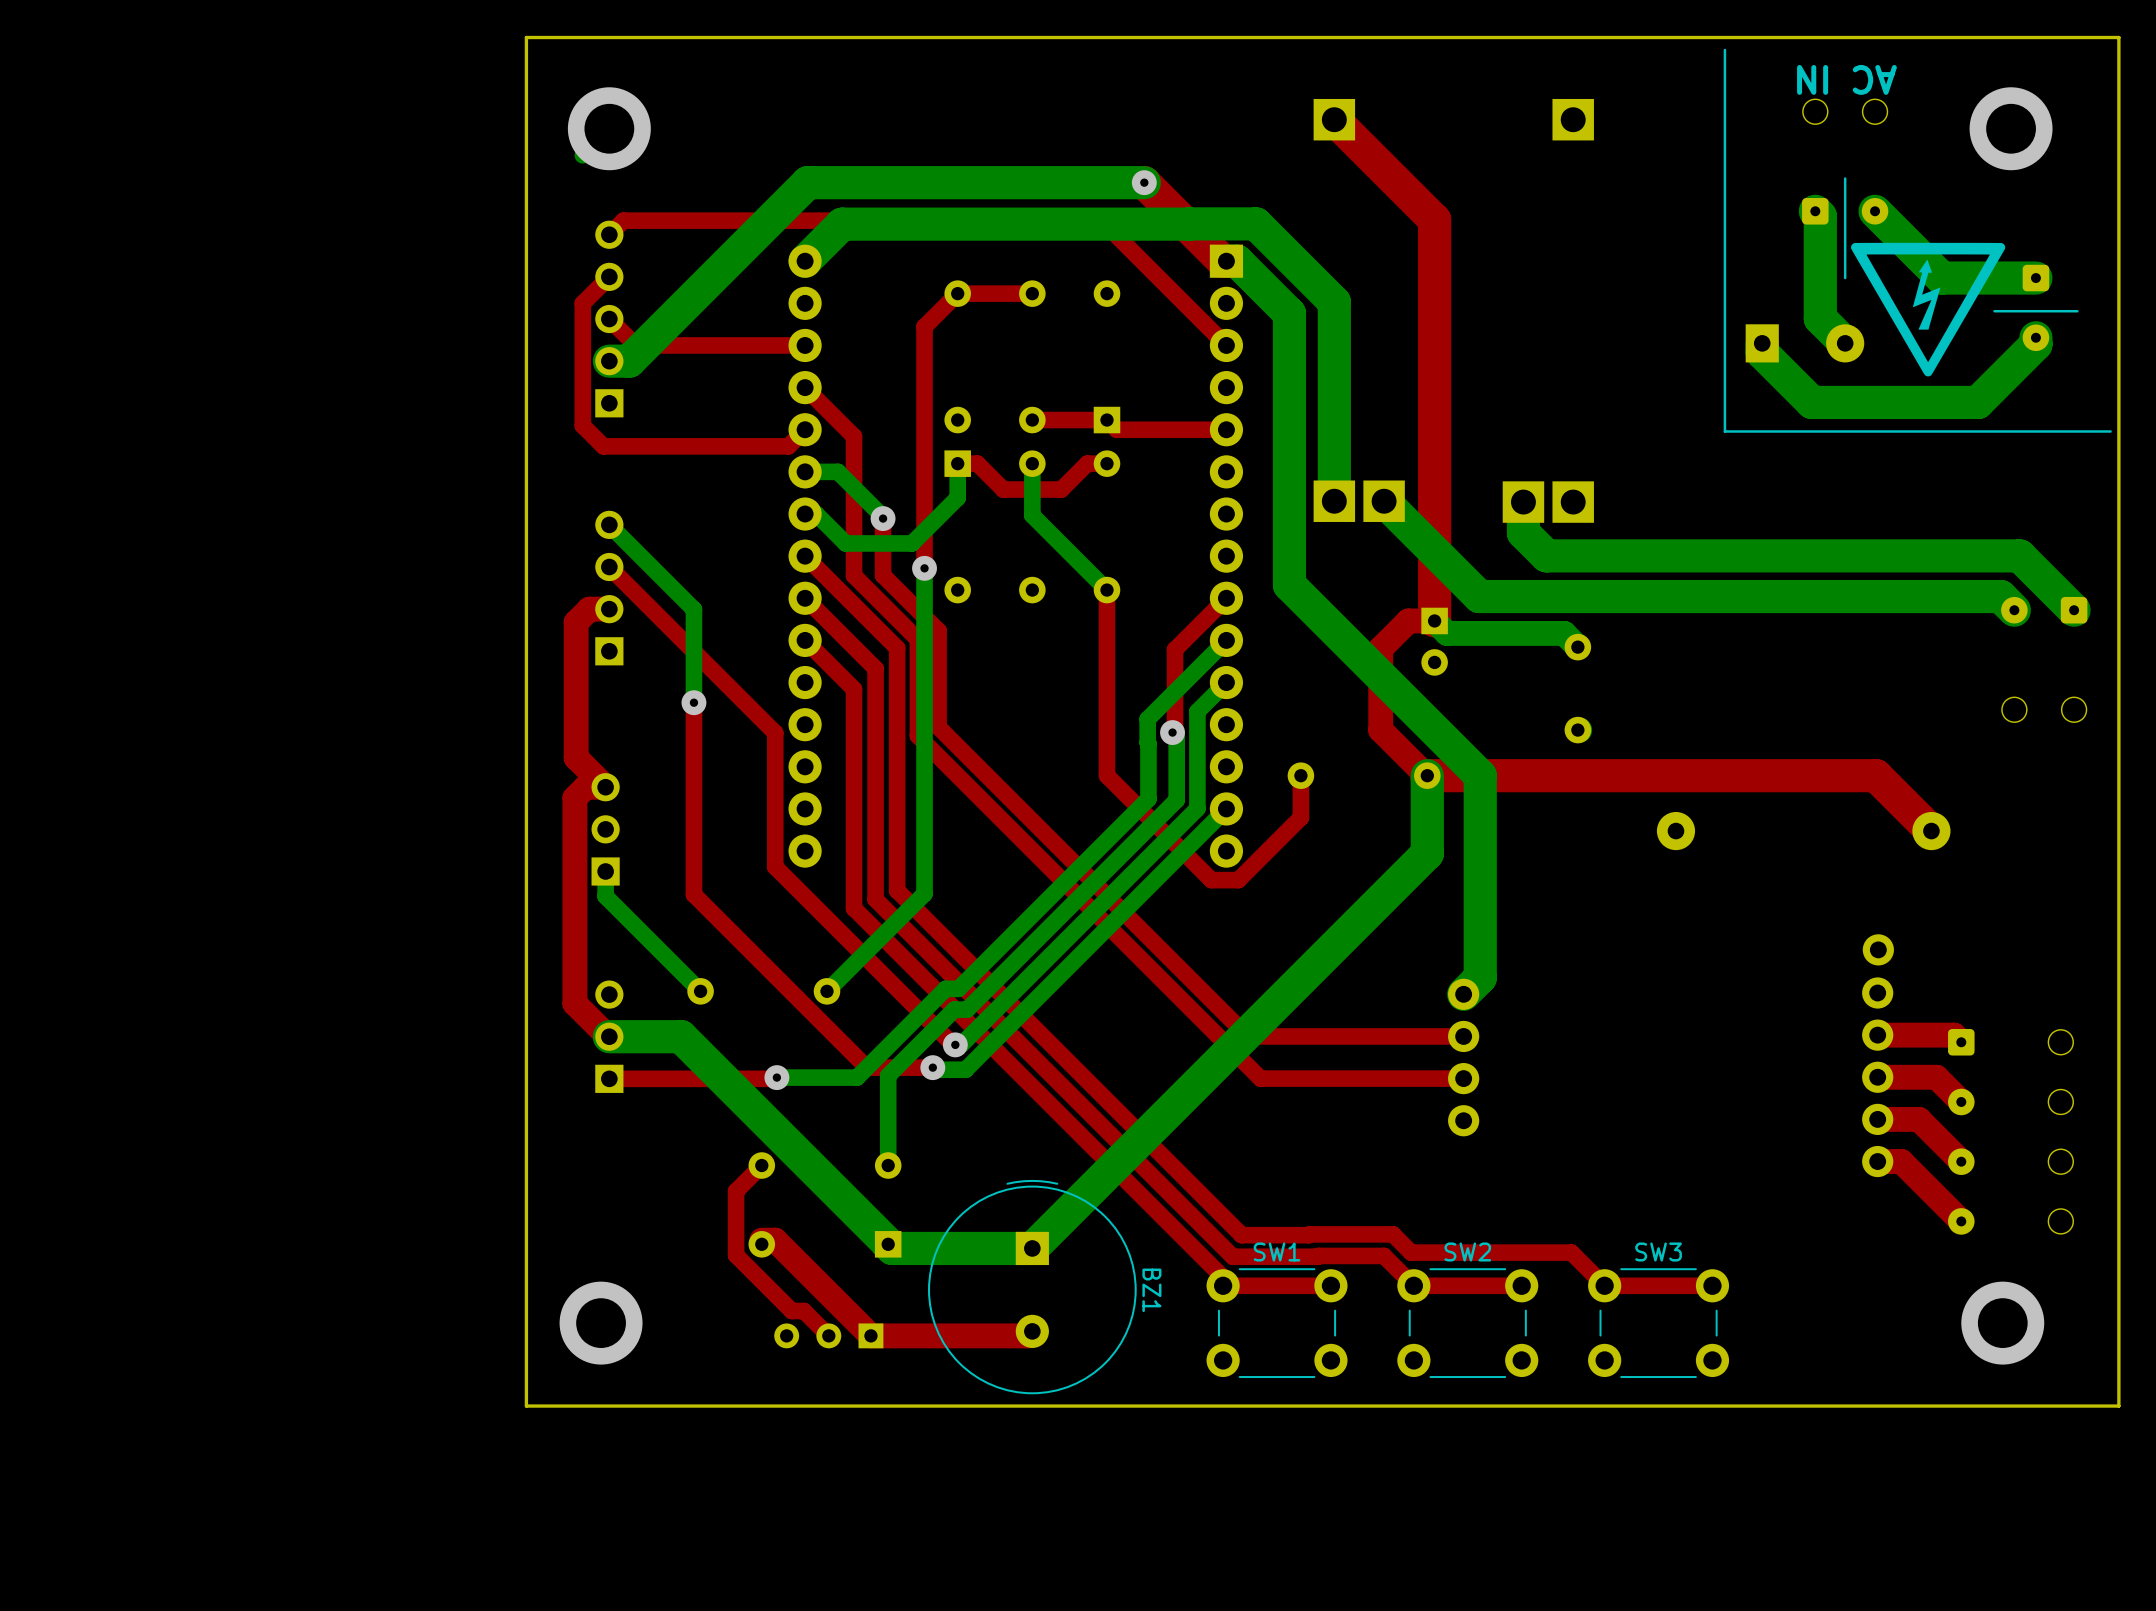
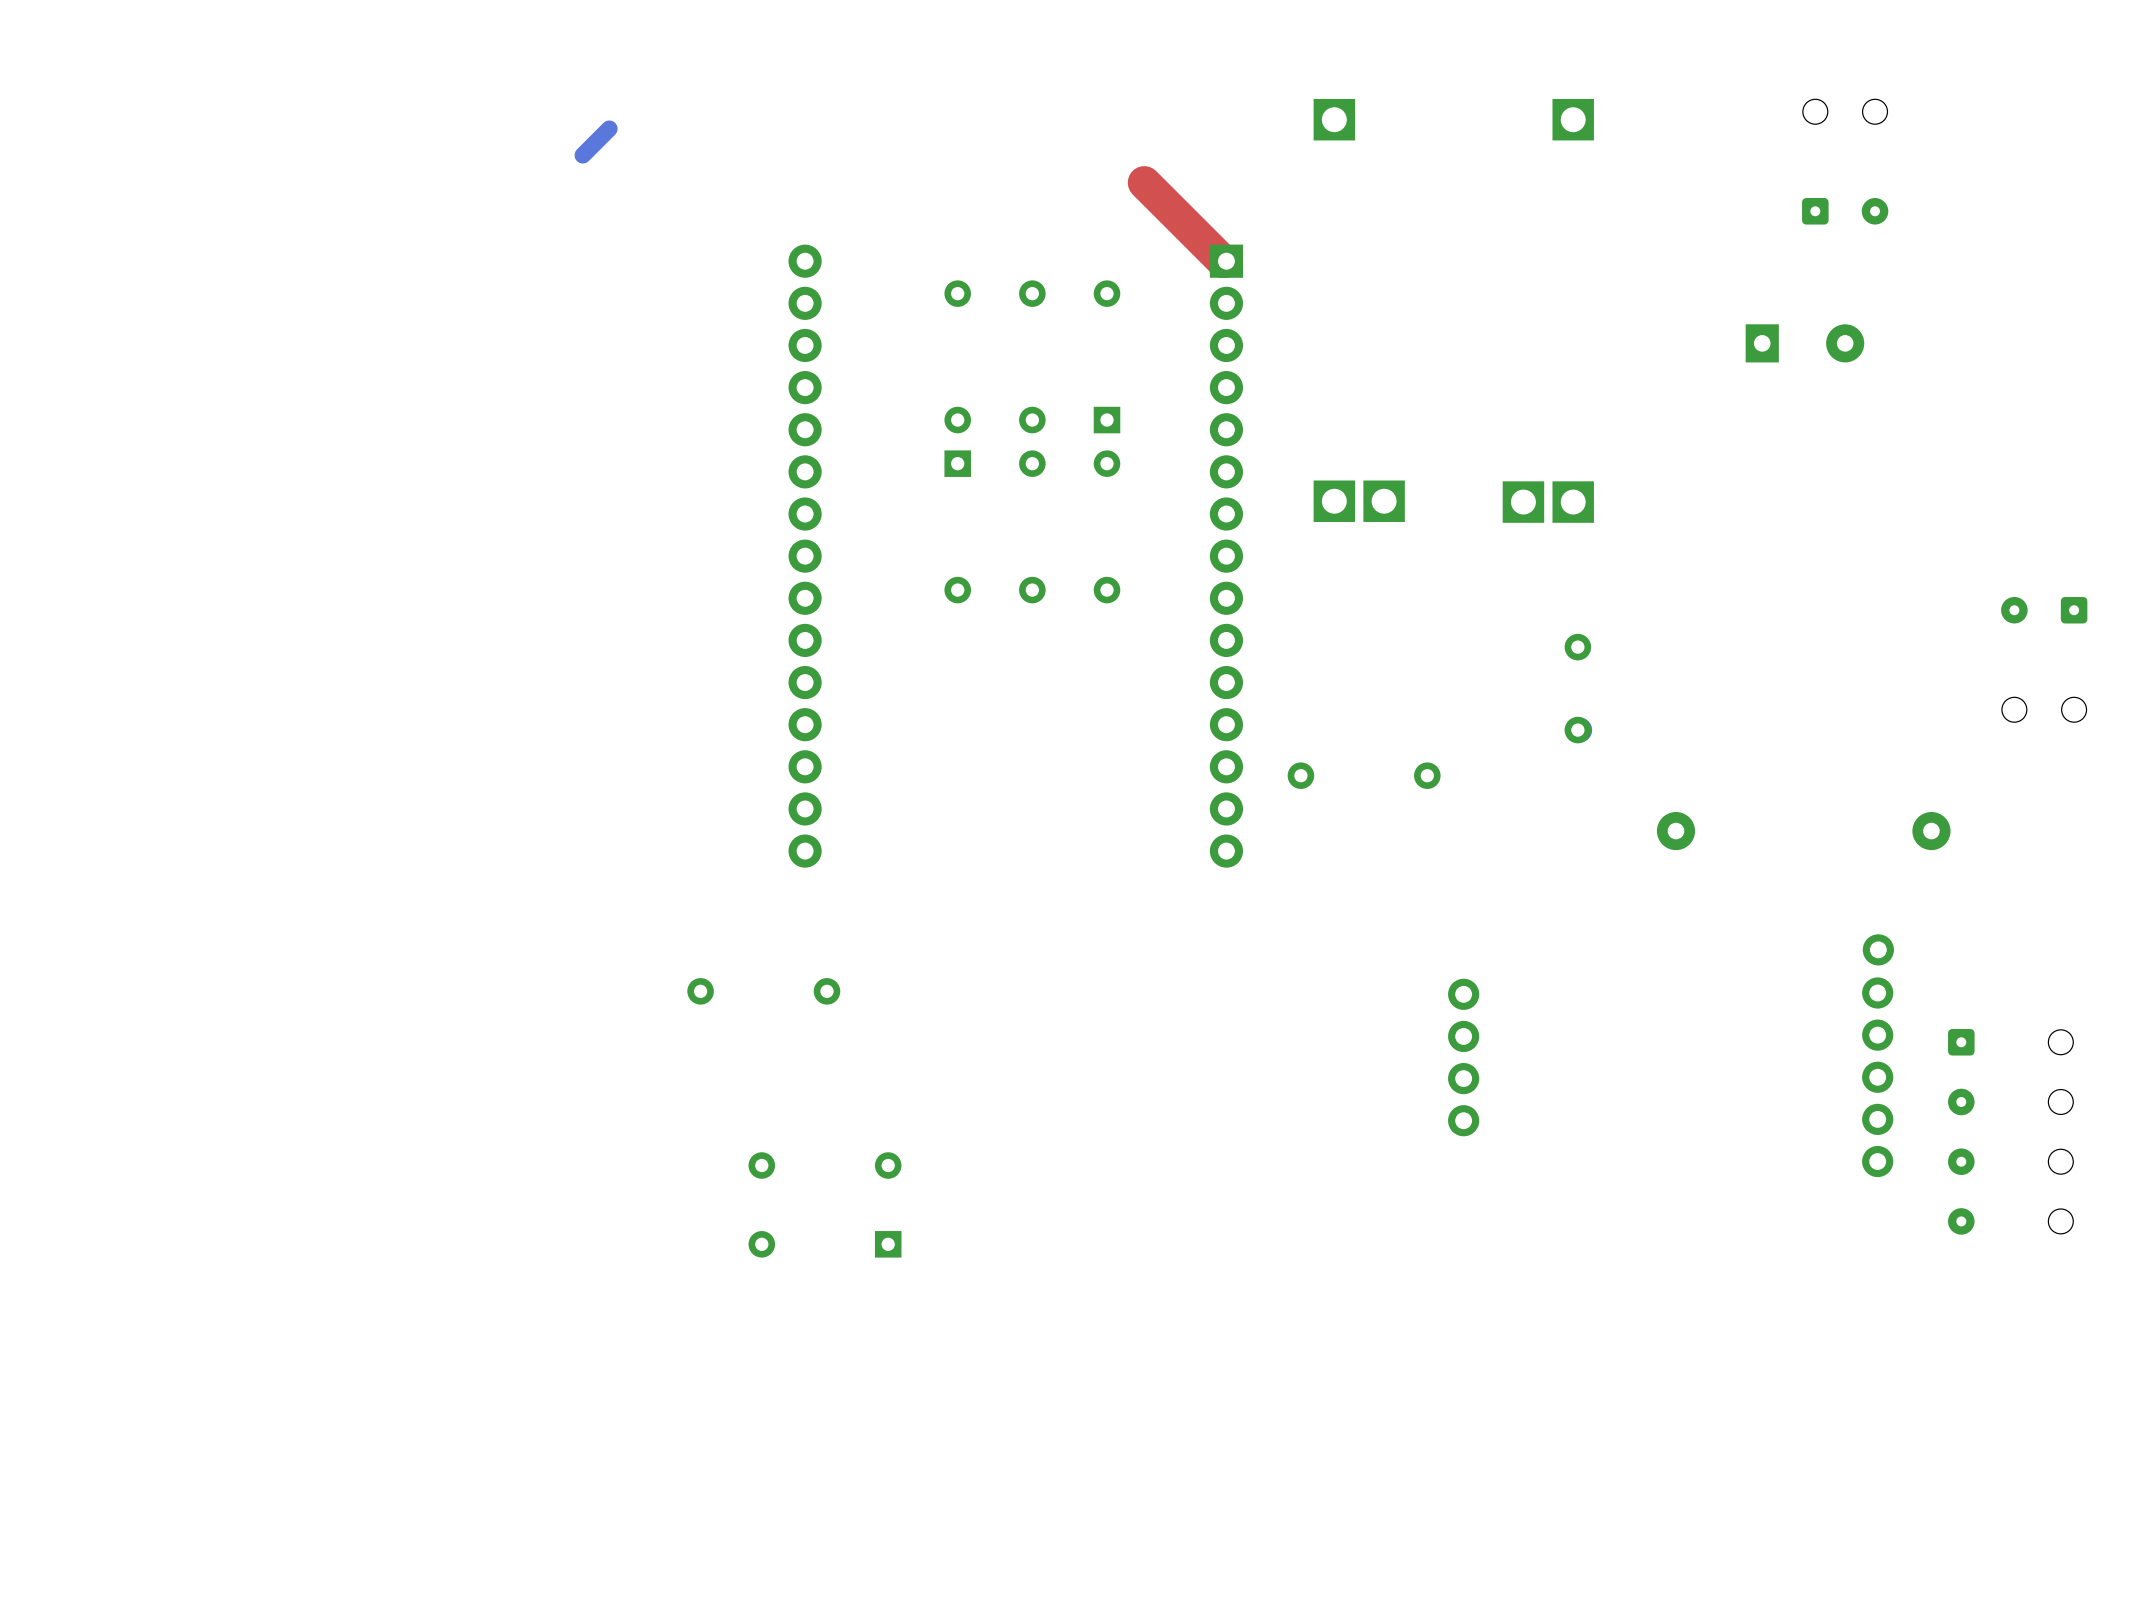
board edge: (2118, 37) (526, 37) (526, 1406) (2118, 1406) (2118, 37) -> none
line: (1724, 49) (1724, 431) (2110, 431) -> none
text: AC IN (1846, 79) -> none
top track: (1334, 119) (1434, 219) (1434, 620) (1408, 620) (1380, 648) (1380, 730) (1426, 775) (1876, 775) (1931, 831) -> none
via: (609, 128) -> none
via: (2011, 128) -> none
line: (1845, 178) (1845, 278) -> none
bottom track: (1144, 182) (807, 182) (629, 361) (609, 361) -> none
via: (1144, 182) -> none
bottom track: (1815, 211) (1820, 216) (1820, 318) (1845, 343) -> none
bottom track: (1875, 211) (1941, 278) (2035, 278) -> none
top track: (609, 234) (623, 220) (1101, 220) (1226, 345) -> none
drawing: [1851, 242, 2006, 377] -> none
bottom track: (805, 261) (842, 224) (1256, 223) (1334, 302) (1334, 501) -> none
bottom track: (1226, 261) (1237, 261) (1289, 313) (1289, 584) (1480, 775) (1480, 977) (1463, 994) -> none
top track: (609, 276) (582, 303) (582, 425) (603, 446) (788, 446) (805, 429) -> none
top track: (1032, 293) (957, 293) (924, 326) (924, 568) -> none
part: (2035, 307) -> none
line: (2077, 311) (1994, 311) -> none
top track: (609, 319) (635, 345) (805, 345) -> none
part: (609, 319) -> none
bottom track: (2035, 337) (2035, 344) (1977, 402) (1812, 402) (1762, 352) (1762, 343) -> none
top track: (805, 387) (854, 436) (854, 575) (917, 639) (917, 735) (1260, 1078) (1463, 1078) -> none
top track: (1032, 420) (1107, 420) (1116, 429) (1226, 429) -> none
bottom track: (957, 463) (957, 497) (912, 543) (845, 543) (816, 514) (805, 514) -> none
bottom track: (1032, 463) (1032, 515) (1107, 590) -> none
top track: (1107, 463) (1087, 463) (1061, 489) (1003, 489) (977, 463) (957, 463) -> none
bottom track: (805, 471) (838, 471) (883, 518) -> none
bottom track: (1384, 501) (1479, 596) (2000, 596) (2014, 610) -> none
bottom track: (1523, 502) (1523, 532) (1546, 555) (2019, 555) (2074, 610) -> none
top track: (883, 518) (883, 575) (938, 630) (938, 727) (1247, 1036) (1463, 1036) -> none
via: (883, 518) -> none
bottom track: (609, 524) (693, 609) (693, 702) -> none
top track: (805, 556) (897, 648) (897, 890) (1241, 1235) (1392, 1234) (1411, 1252) (1571, 1252) (1604, 1285) (1712, 1285) -> none
top track: (609, 567) (775, 732) (775, 866) (953, 1044) (955, 1044) -> none
bottom track: (924, 568) (924, 893) (826, 991) -> none
via: (924, 568) -> none
part: (609, 588) -> none
top track: (1107, 590) (1107, 775) (1211, 880) (1238, 880) (1300, 817) (1300, 775) -> none
top track: (805, 598) (875, 668) (875, 899) (1232, 1256) (1384, 1255) (1413, 1285) (1521, 1285) -> none
top track: (1226, 598) (1175, 649) (1175, 730) (1172, 732) -> none
top track: (609, 609) (589, 609) (576, 622) (576, 757) (605, 787) (585, 787) (574, 797) (574, 1003) (609, 1036) -> none
bottom track: (1434, 620) (1447, 633) (1564, 633) (1577, 647) -> none
top track: (805, 640) (854, 689) (854, 908) (1223, 1277) (1223, 1285) (1330, 1285) -> none
bottom track: (1226, 640) (1147, 719) (1148, 798) (958, 988) (945, 988) (857, 1077) (776, 1077) -> none
part: (1434, 641) -> none
bottom track: (1226, 682) (1197, 711) (1197, 808) (961, 1044) (955, 1044) -> none
top track: (693, 702) (693, 894) (866, 1067) (932, 1067) -> none
via: (693, 702) -> none
bottom track: (1172, 732) (1176, 736) (1176, 800) (967, 1009) (954, 1009) (888, 1075) (888, 1165) -> none
via: (1172, 732) -> none
bottom track: (1427, 775) (1427, 853) (1032, 1248) (892, 1248) (681, 1036) (609, 1036) -> none
bottom track: (1226, 808) (965, 1069) (934, 1069) (932, 1067) -> none
part: (605, 829) -> none
bottom track: (605, 871) (605, 896) (700, 991) -> none
top track: (1877, 1035) (1954, 1035) (1961, 1042) -> none
part: (609, 1036) -> none
via: (955, 1044) -> none
via: (932, 1067) -> none
top track: (776, 1077) (609, 1078) -> none
via: (776, 1077) -> none
top track: (1877, 1077) (1936, 1077) (1961, 1101) -> none
top track: (1877, 1119) (1919, 1119) (1961, 1161) -> none
top track: (1877, 1161) (1901, 1161) (1961, 1221) -> none
top track: (761, 1165) (736, 1191) (736, 1255) (791, 1311) (803, 1311) (828, 1335) -> none
top track: (761, 1240) (775, 1240) (870, 1335) (1027, 1335) (1032, 1331) -> none
BZ1: (1032, 1287) -> none
via: (601, 1323) -> none
SW1: (1277, 1323) -> none
SW2: (1467, 1323) -> none
SW3: (1658, 1323) -> none
via: (2002, 1323) -> none
part: (828, 1335) -> none

